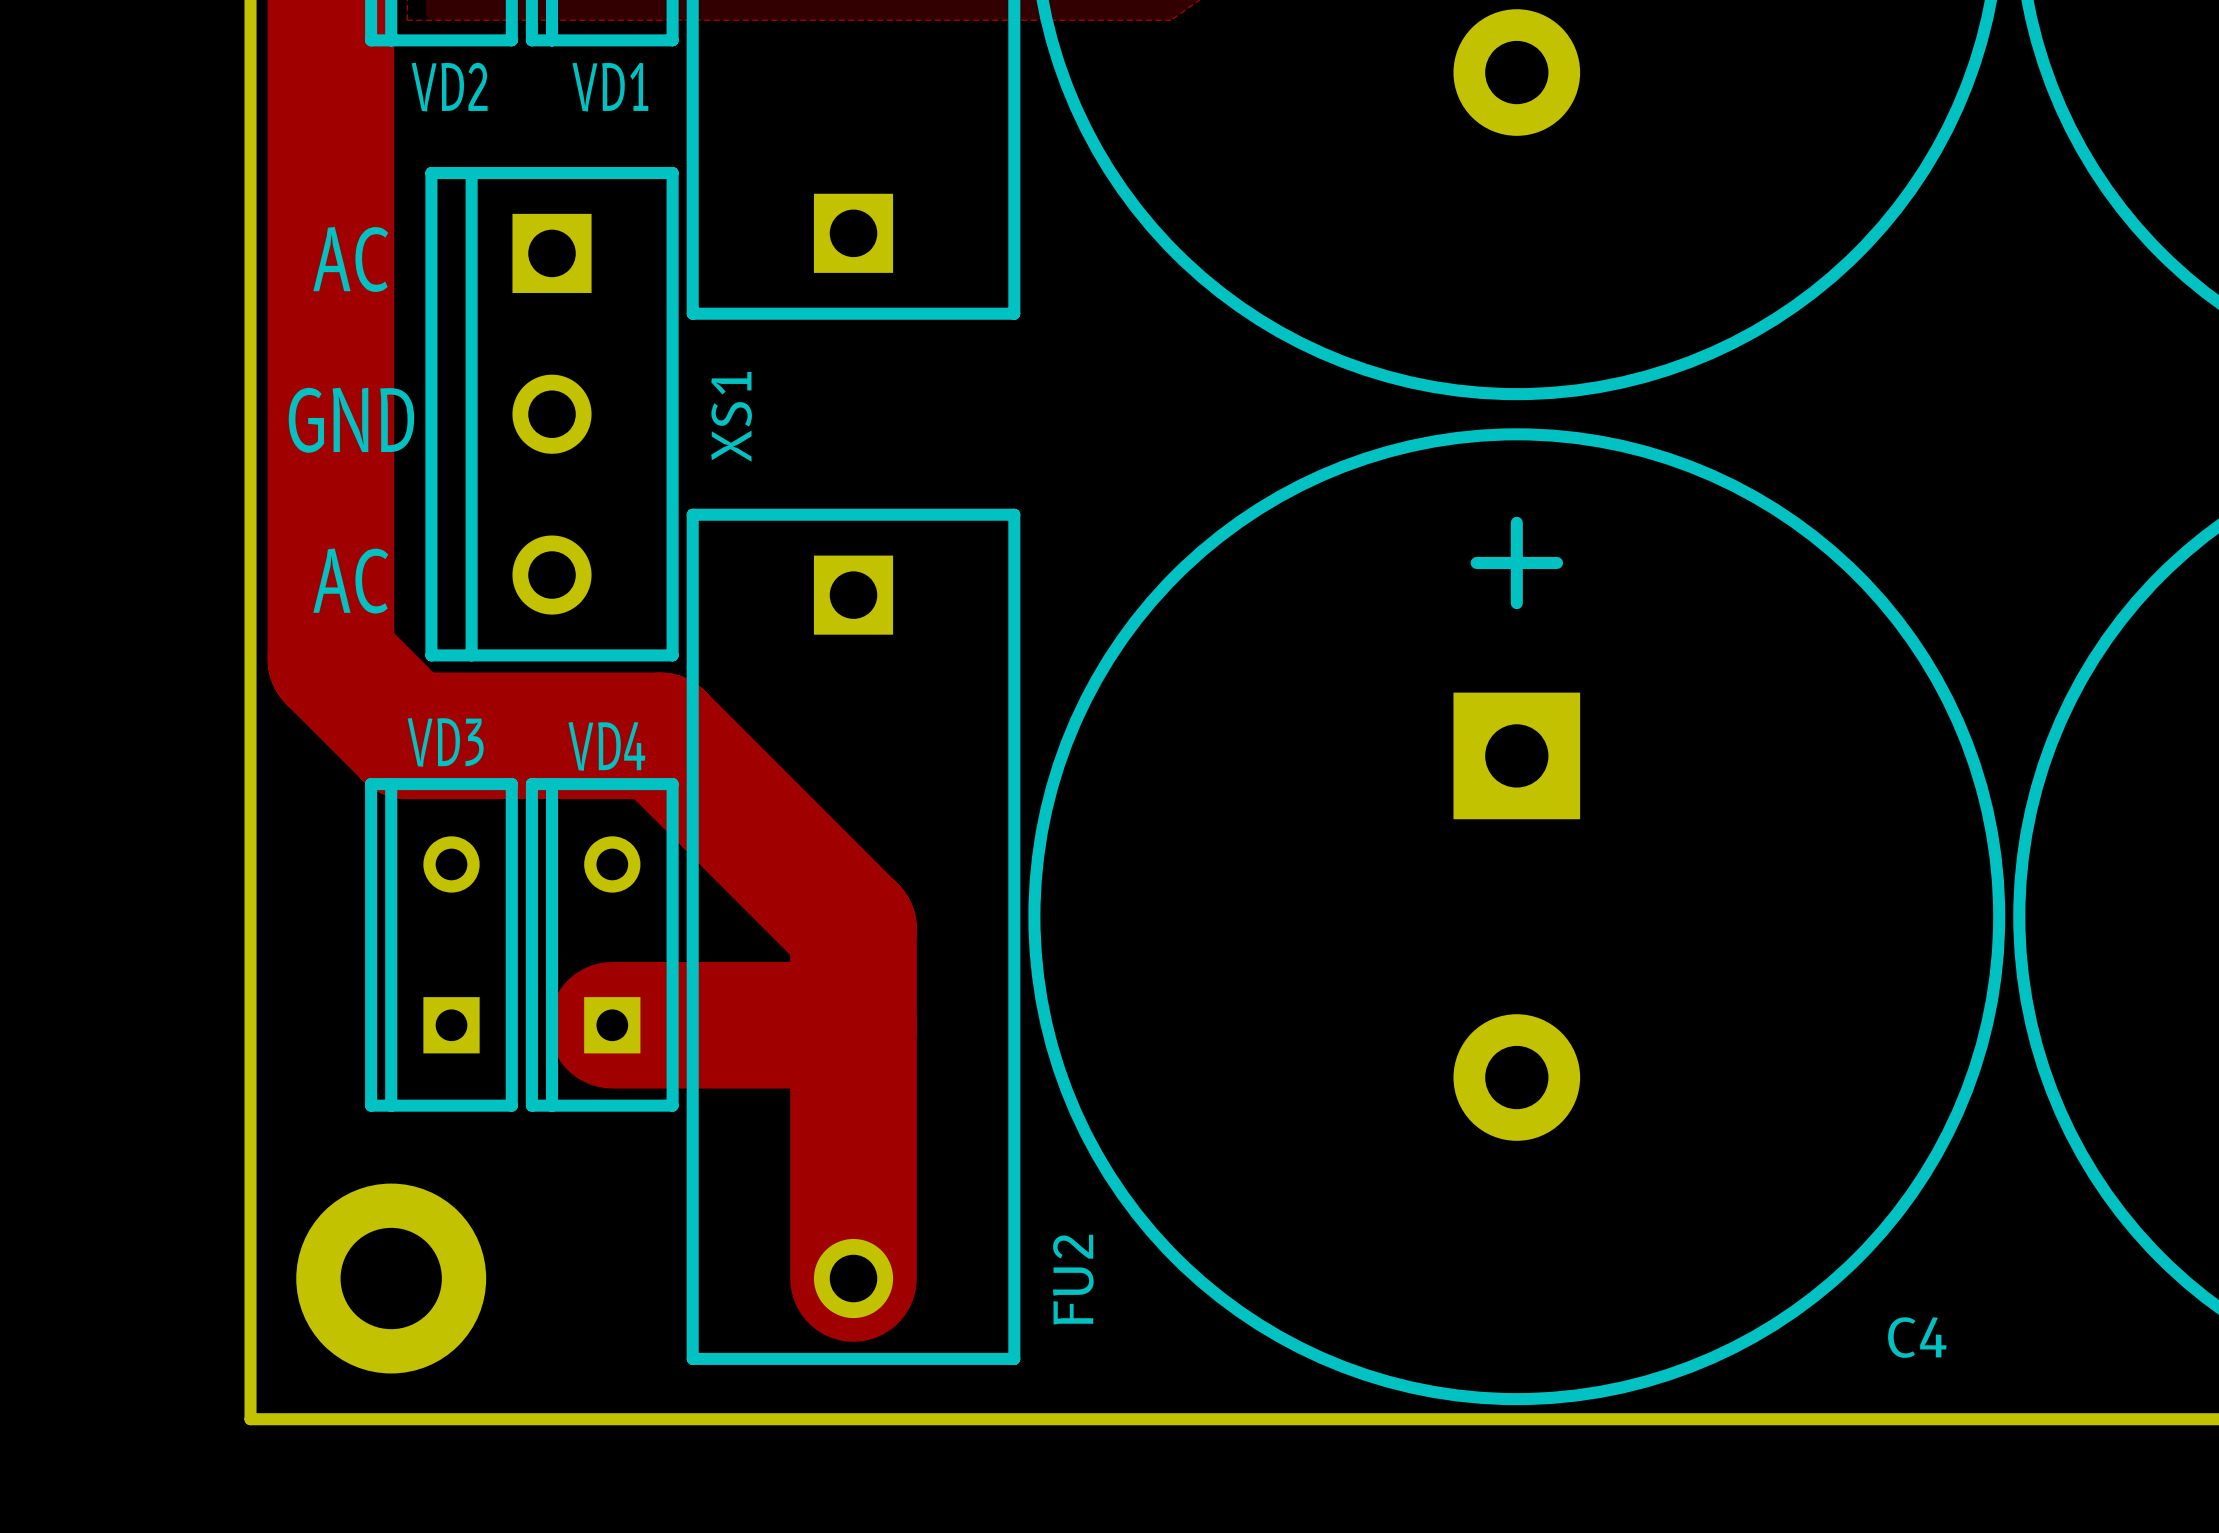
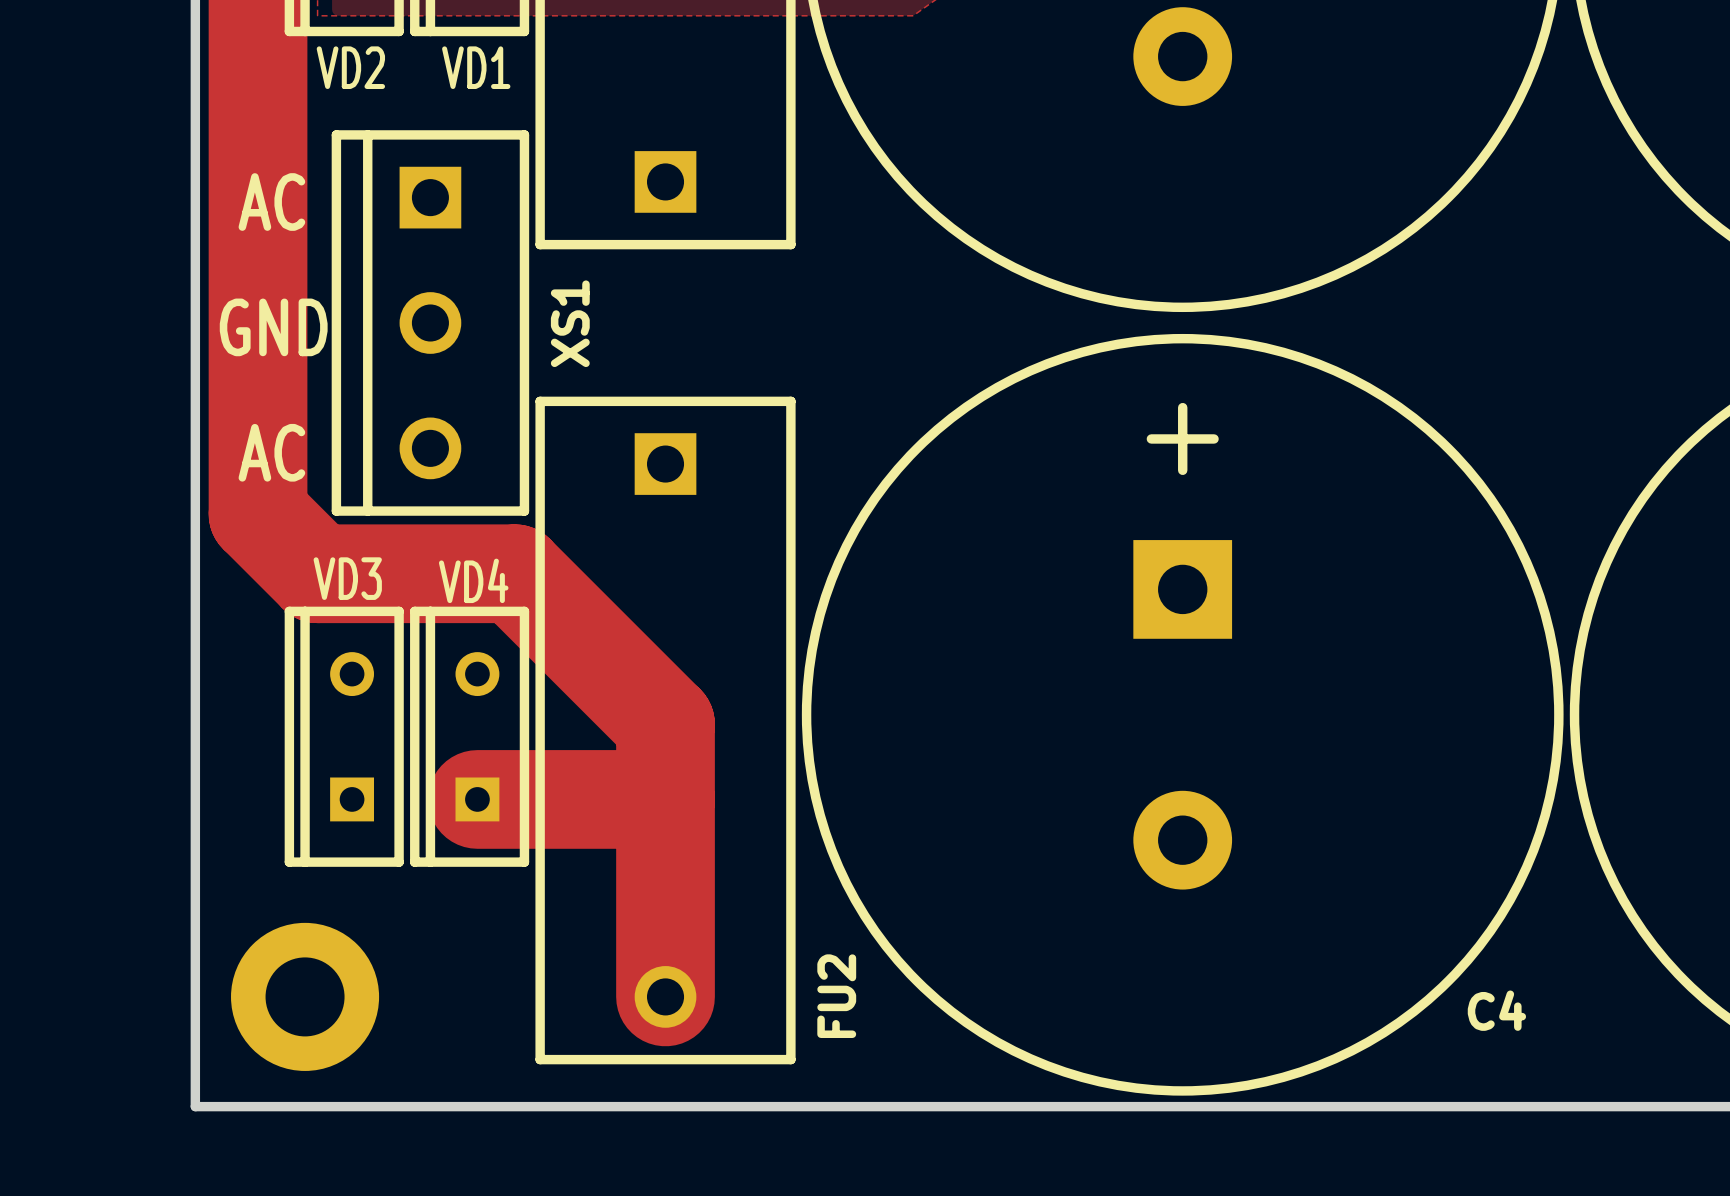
C4 name position: C4 (1917, 1337) -> C4 (1496, 1010)

